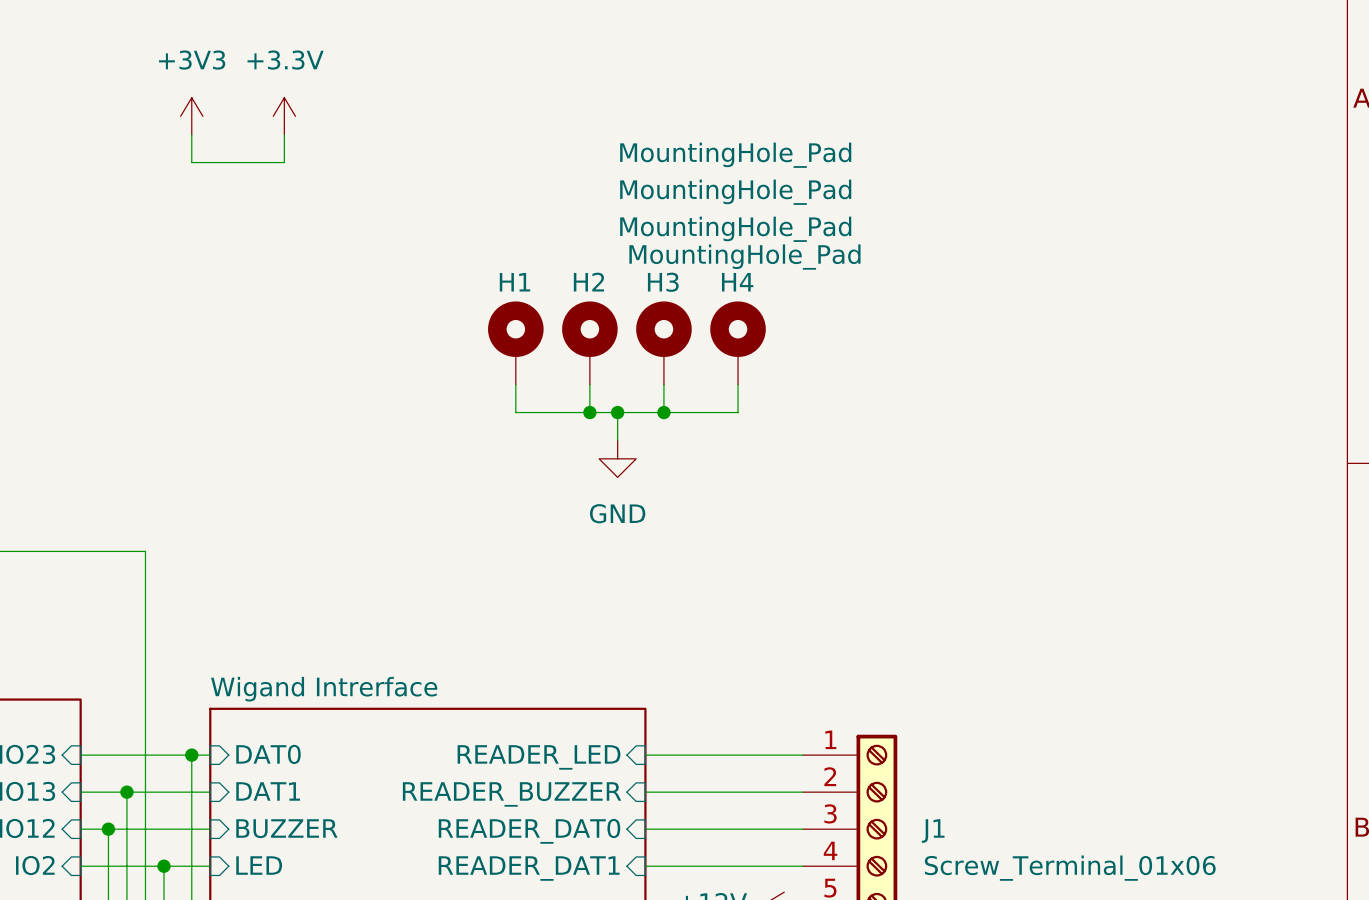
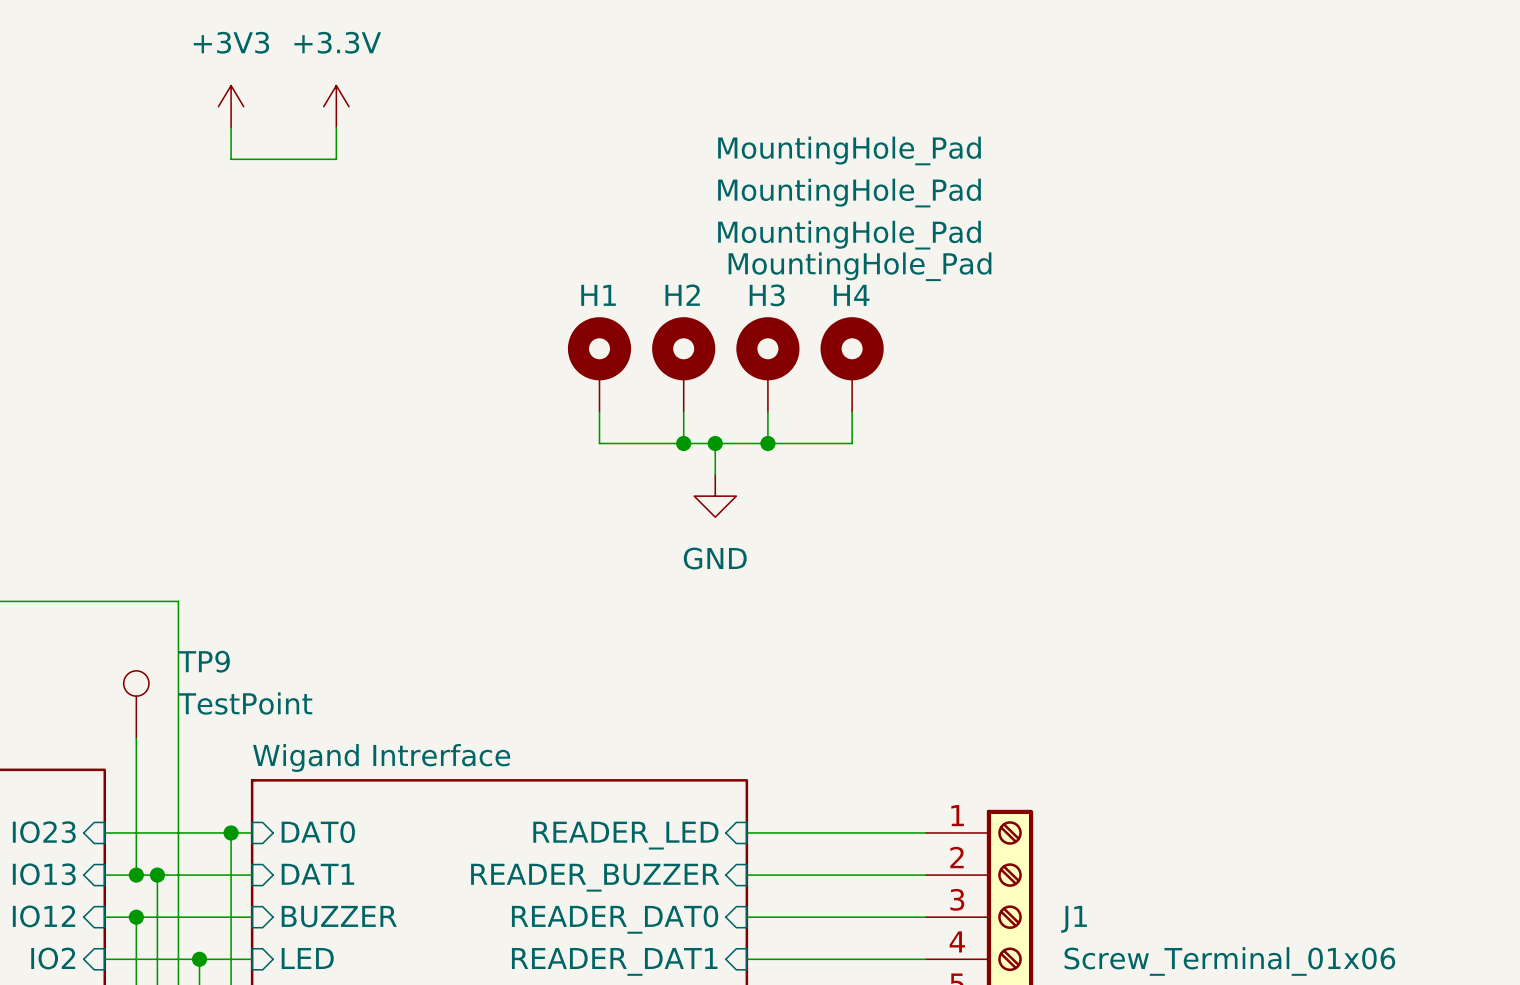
TP9: none -> TestPoint (136, 704)
wire: none -> (136, 738) (136, 875)
junction: none -> (136, 875)

